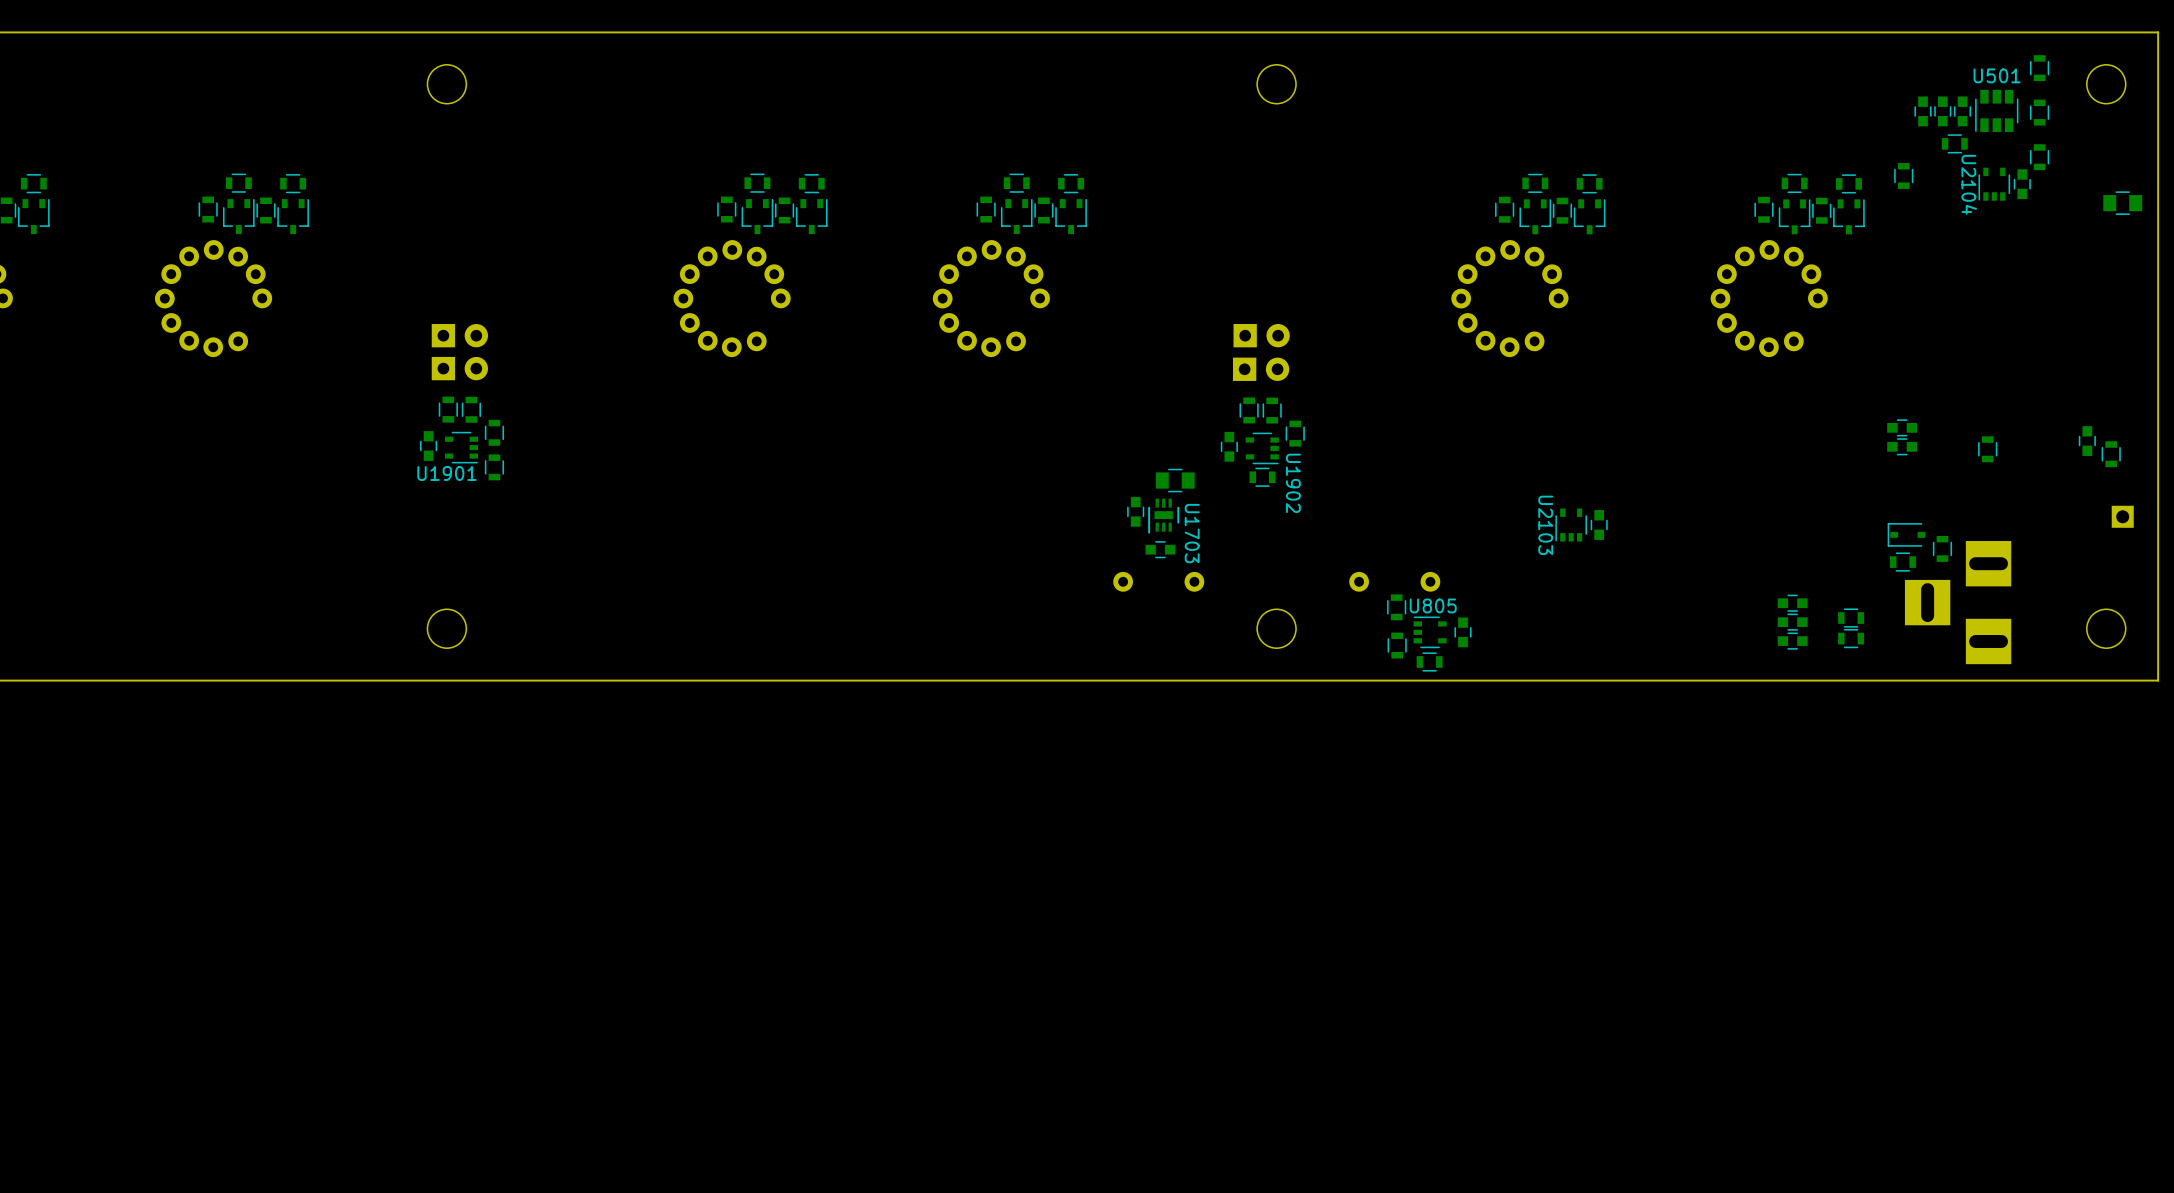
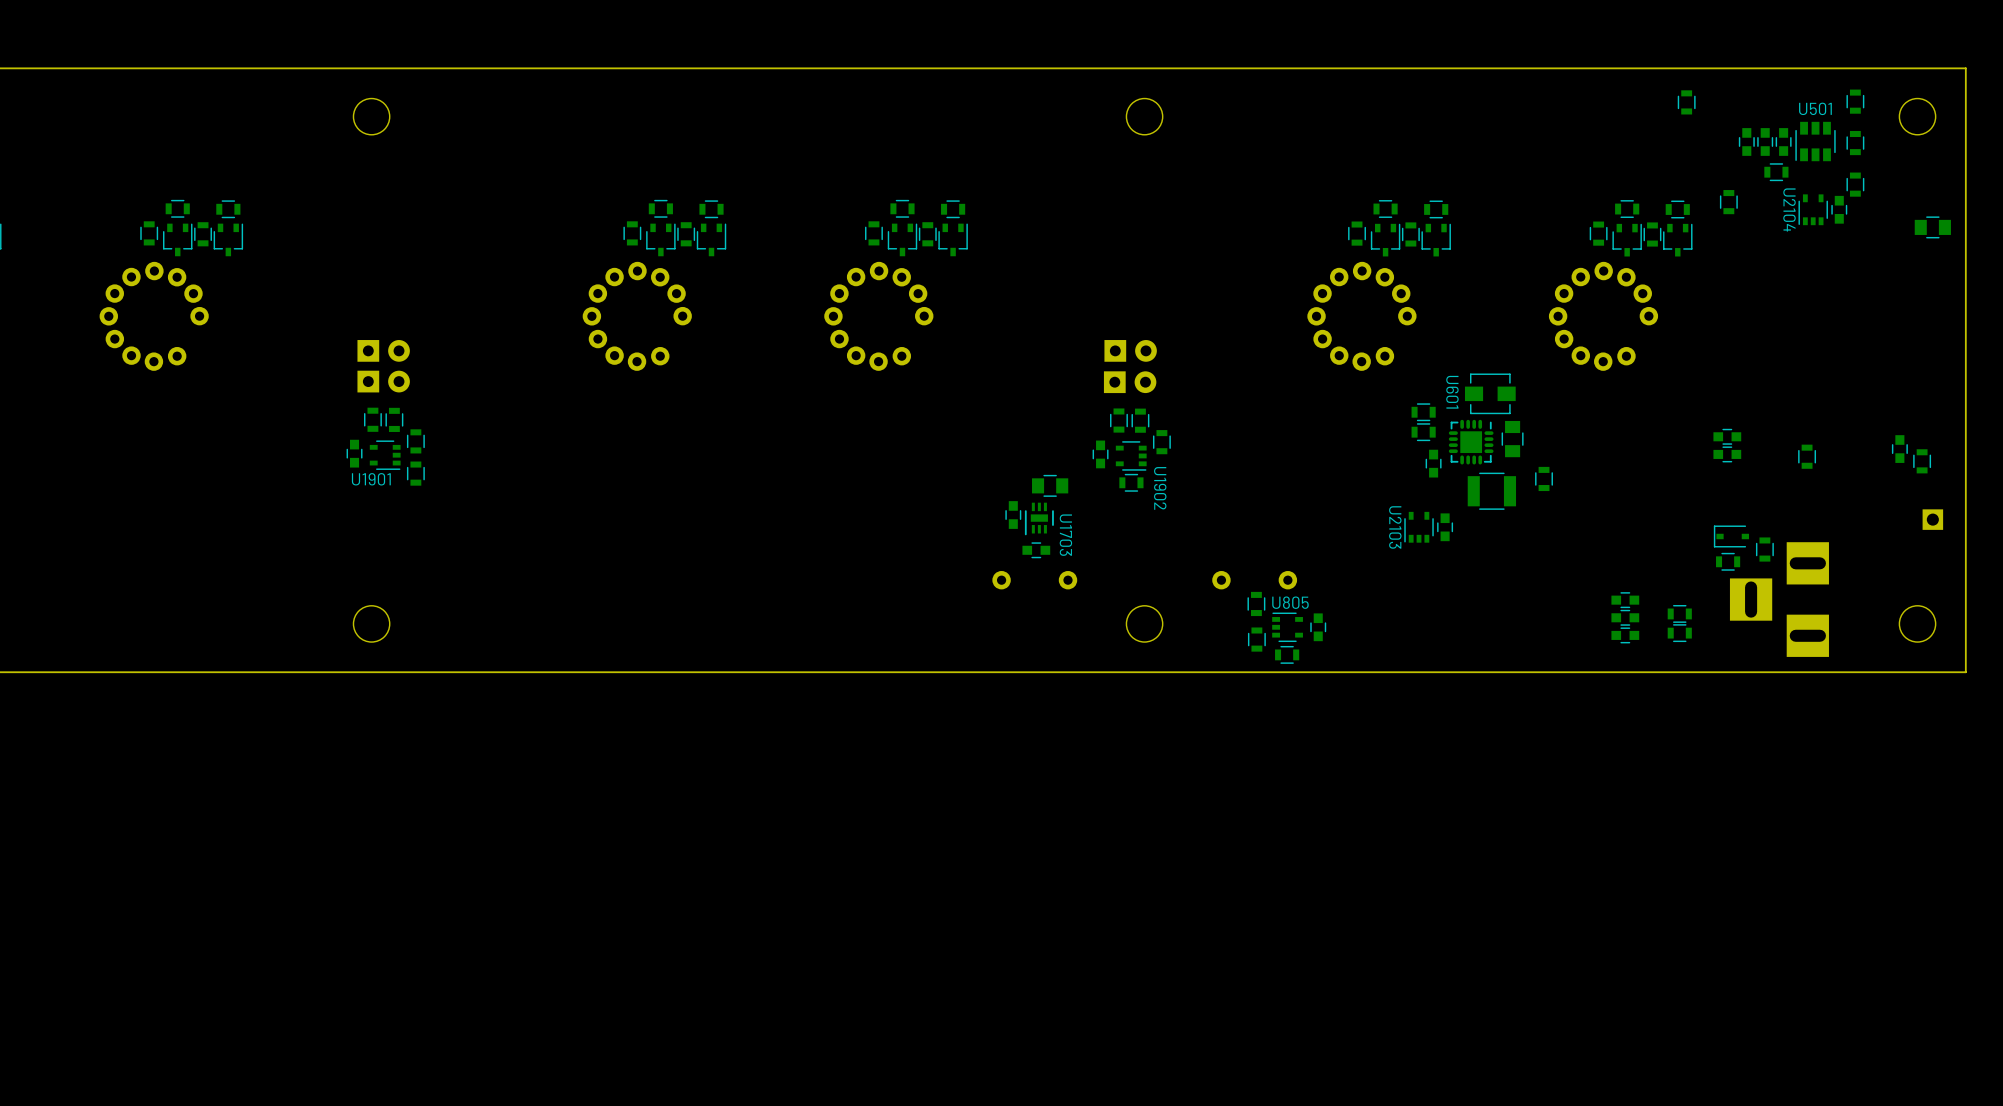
part: none -> (1686, 102)
part: none -> (1490, 393)
part: none -> (1423, 412)
part: none -> (1423, 432)
part: none -> (1512, 439)
U601: none -> (1471, 442)
part: none -> (1433, 463)
part: none -> (1544, 478)
part: none -> (1491, 491)

